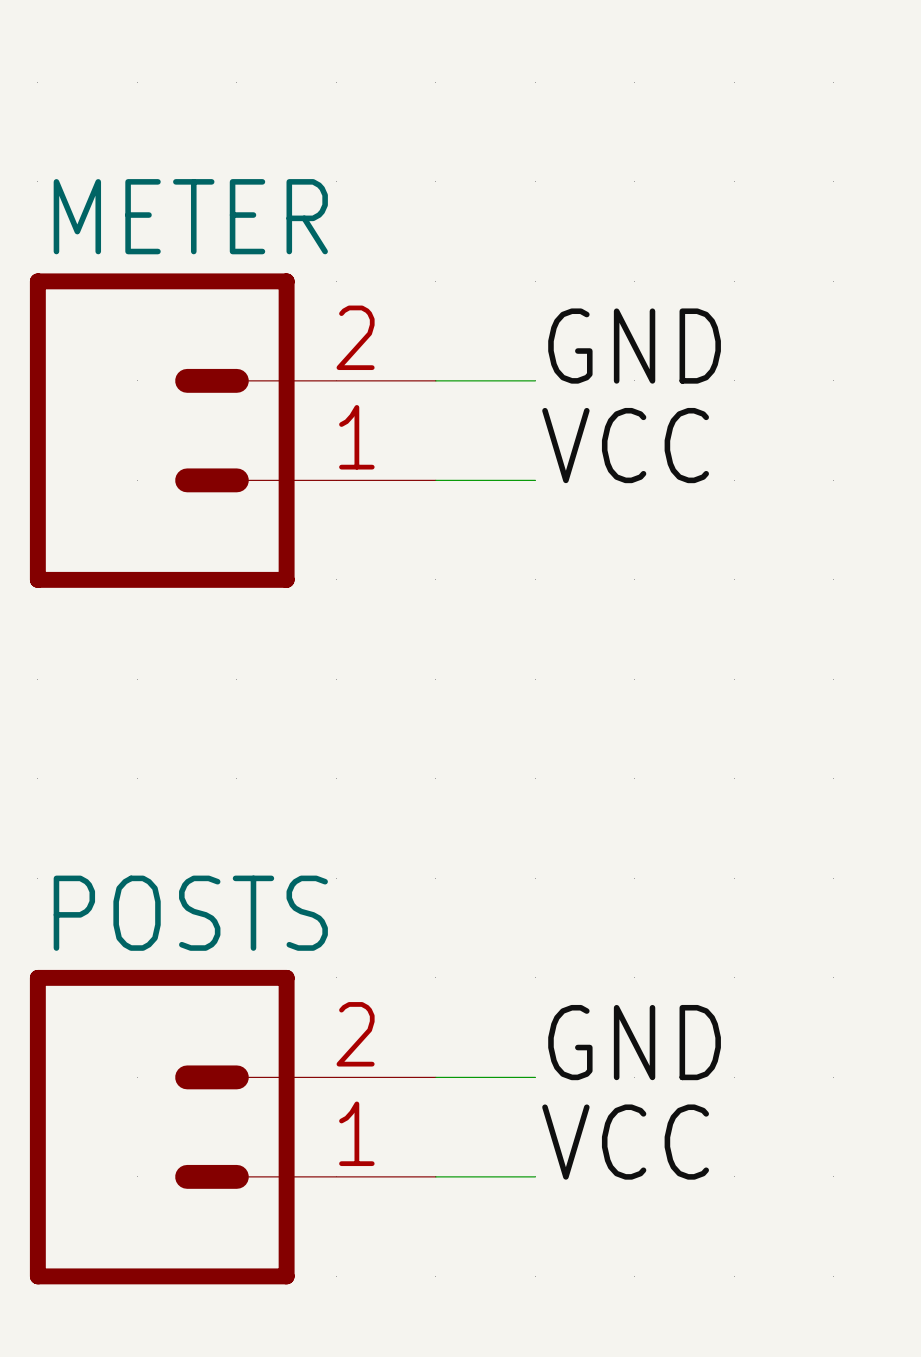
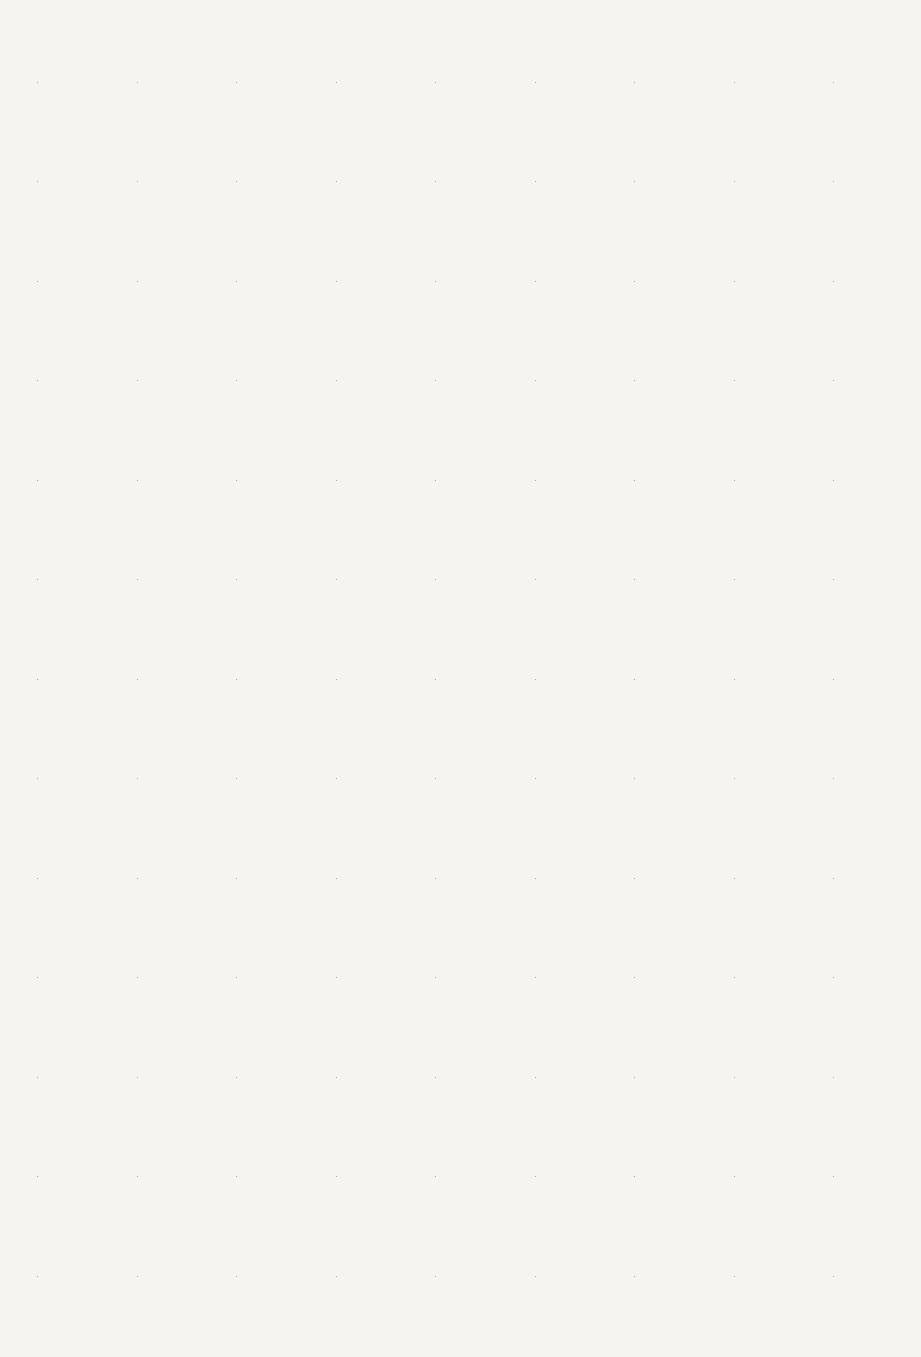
label: GND (634, 346) -> none
wire: (435, 380) (535, 380) -> none
METER: (232, 430) -> none
label: VCC (625, 445) -> none
wire: (435, 480) (535, 480) -> none
label: GND (634, 1042) -> none
wire: (435, 1077) (535, 1077) -> none
POSTS: (232, 1127) -> none
label: VCC (625, 1142) -> none
wire: (435, 1176) (535, 1176) -> none

